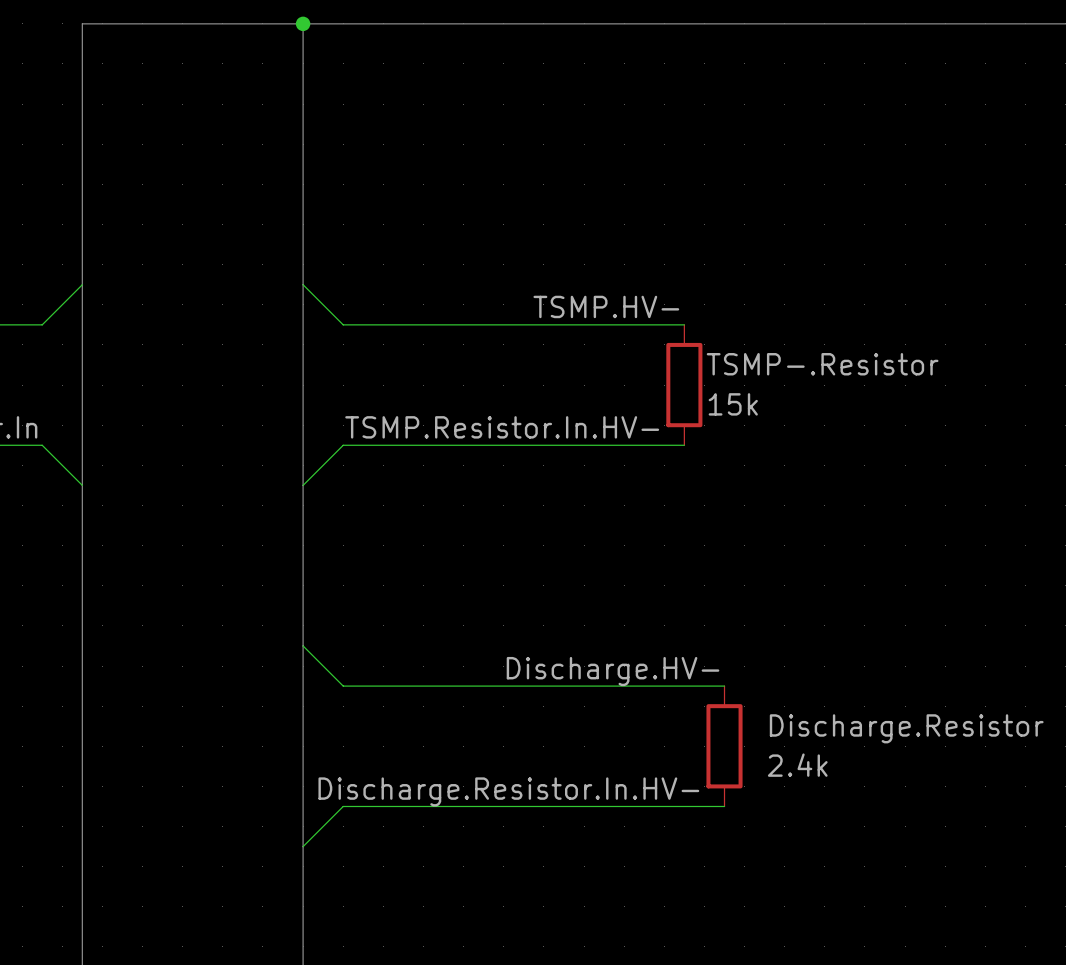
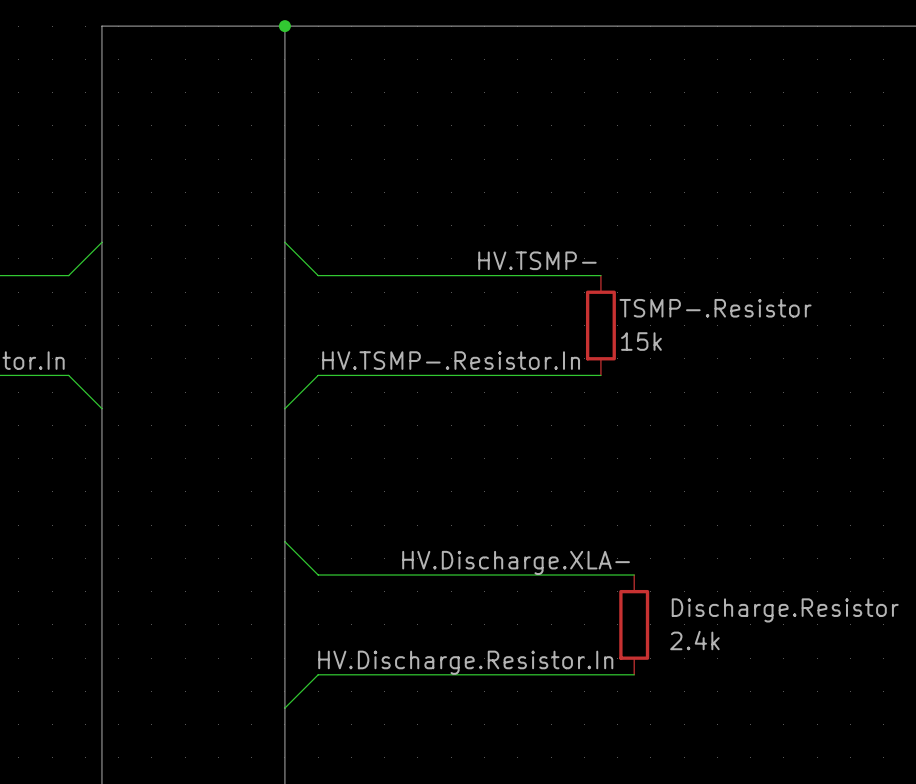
label: TSMP.HV- (606, 306) -> HV.TSMP- (537, 260)
label: TSMP.Resistor.In.HV- (502, 427) -> HV.TSMP-.Resistor.In (451, 360)
label: Discharge.HV- (613, 671) -> HV.Discharge.XLA- (516, 562)
label: Discharge.Resistor.In.HV- (508, 791) -> HV.Discharge.Resistor.In (465, 662)

